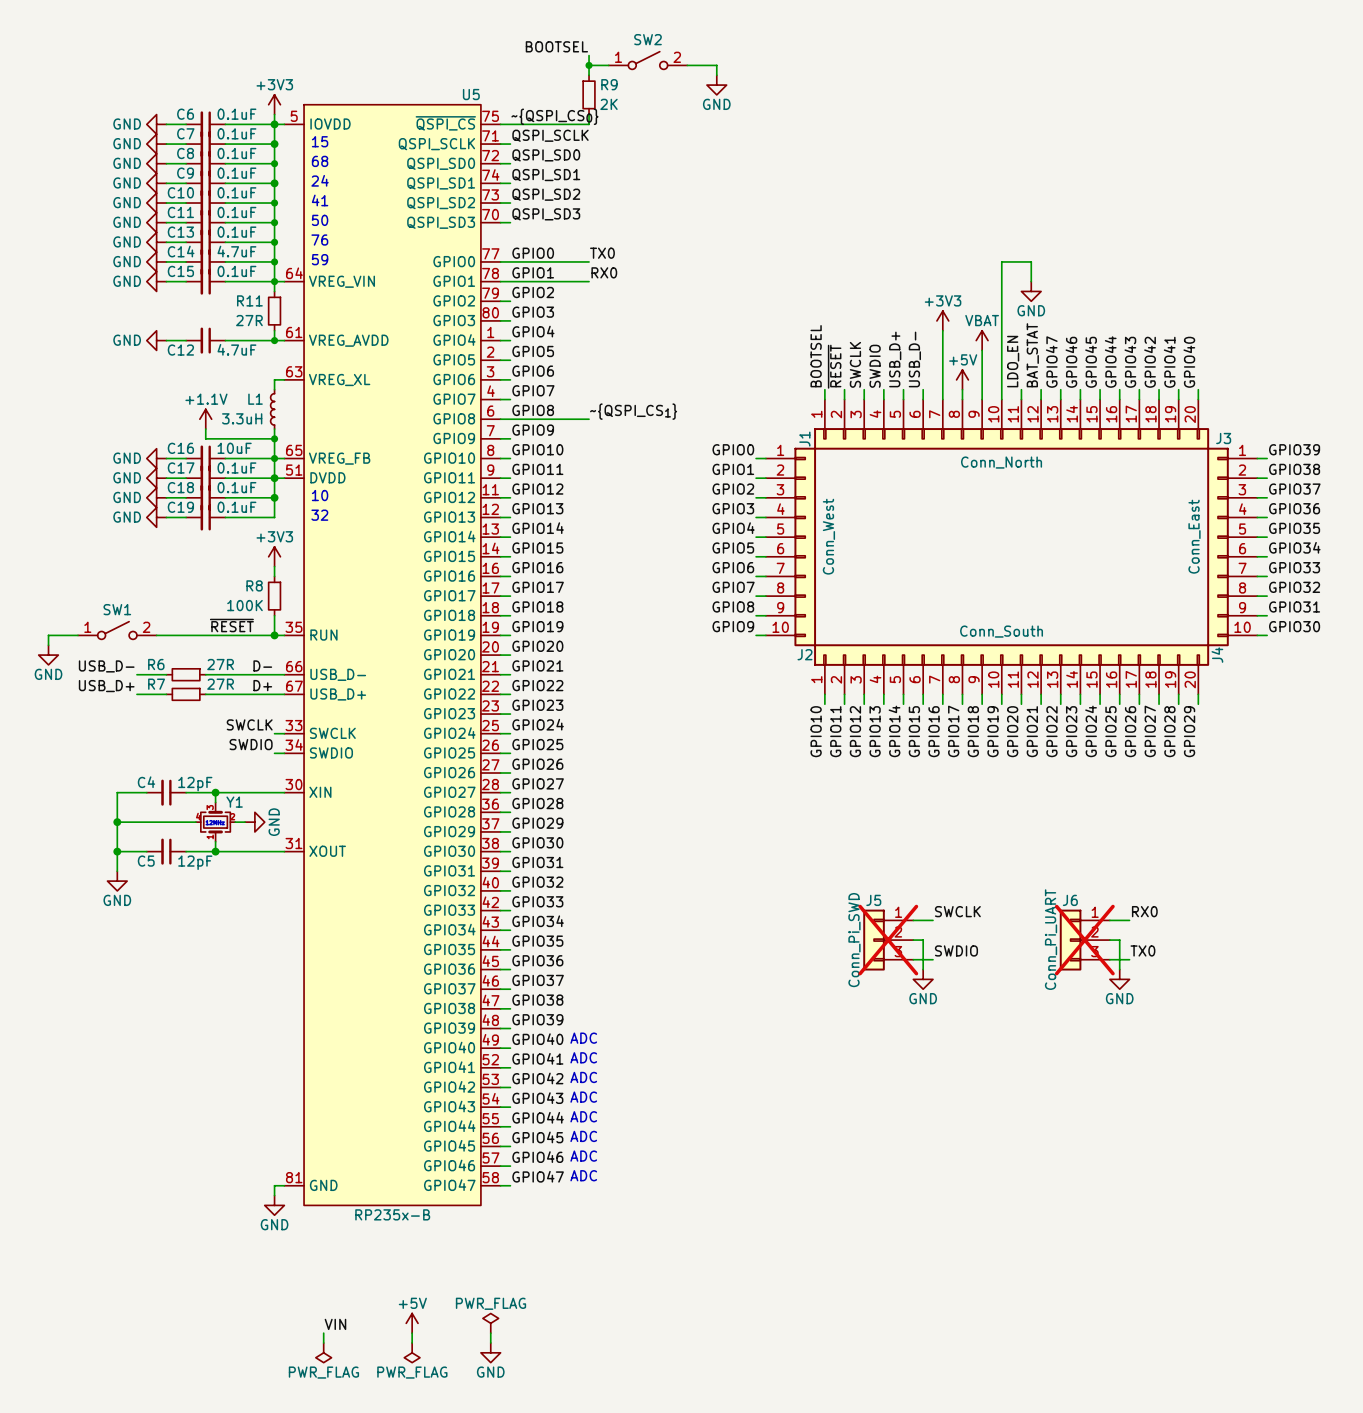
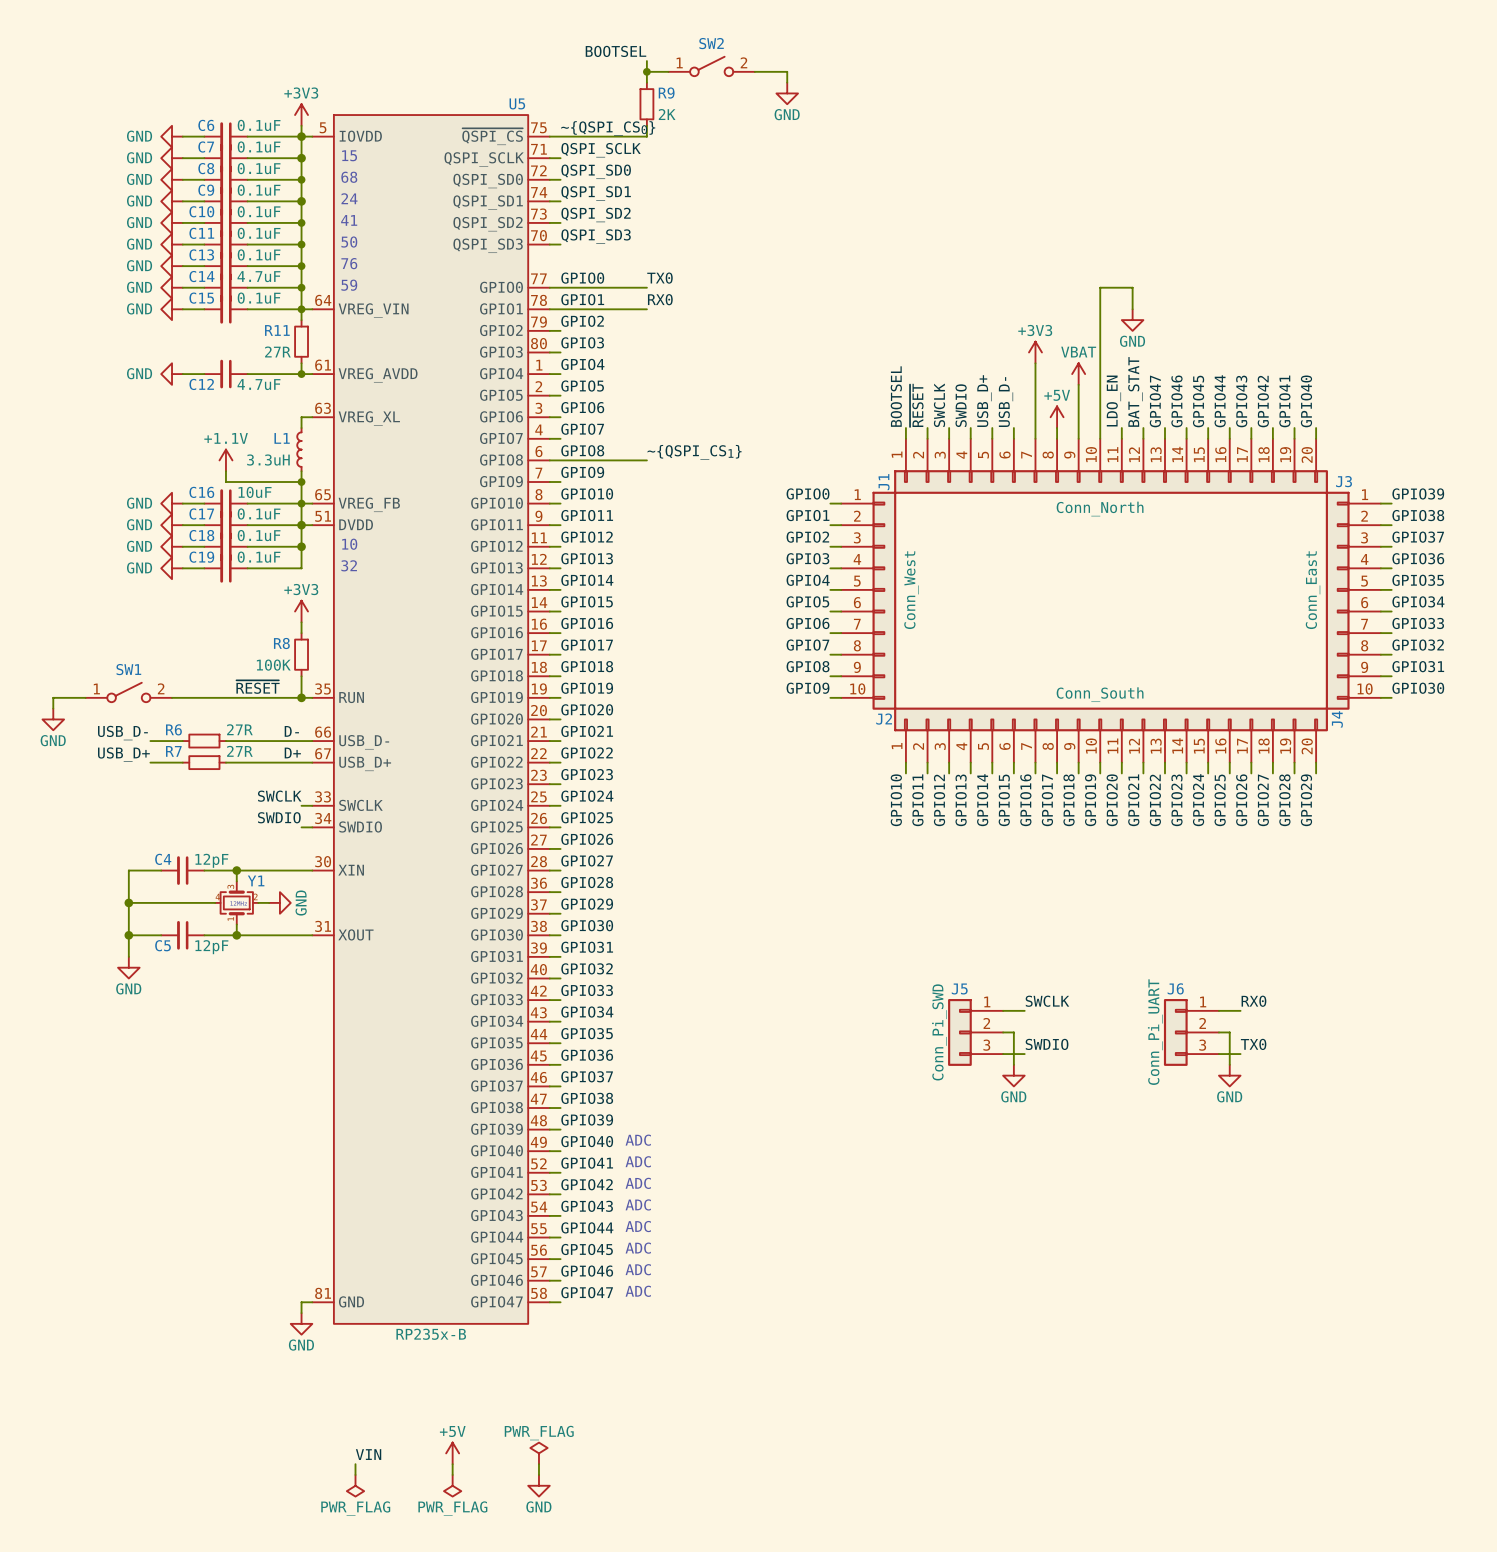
J5 do-not-place cross: (888, 940) -> none
J6 do-not-place cross: (1084, 940) -> none

